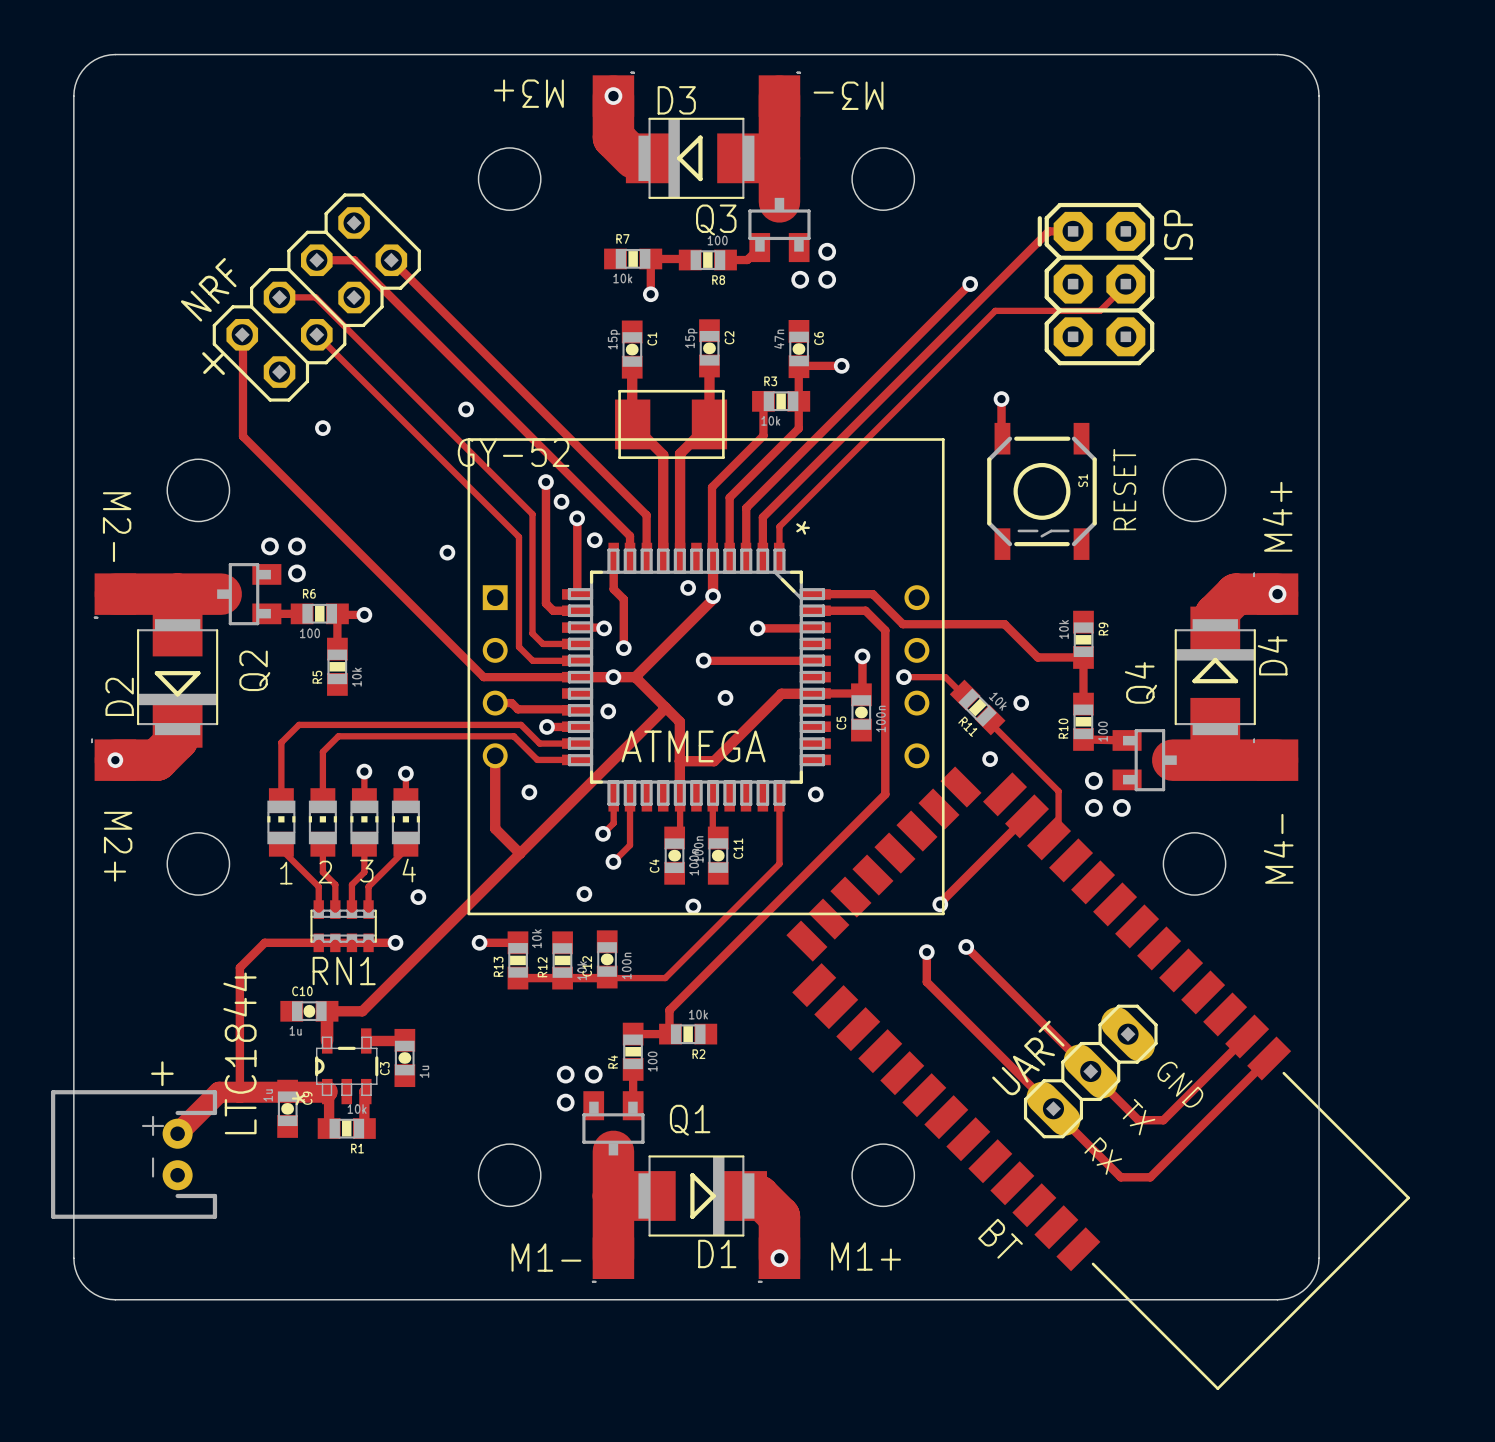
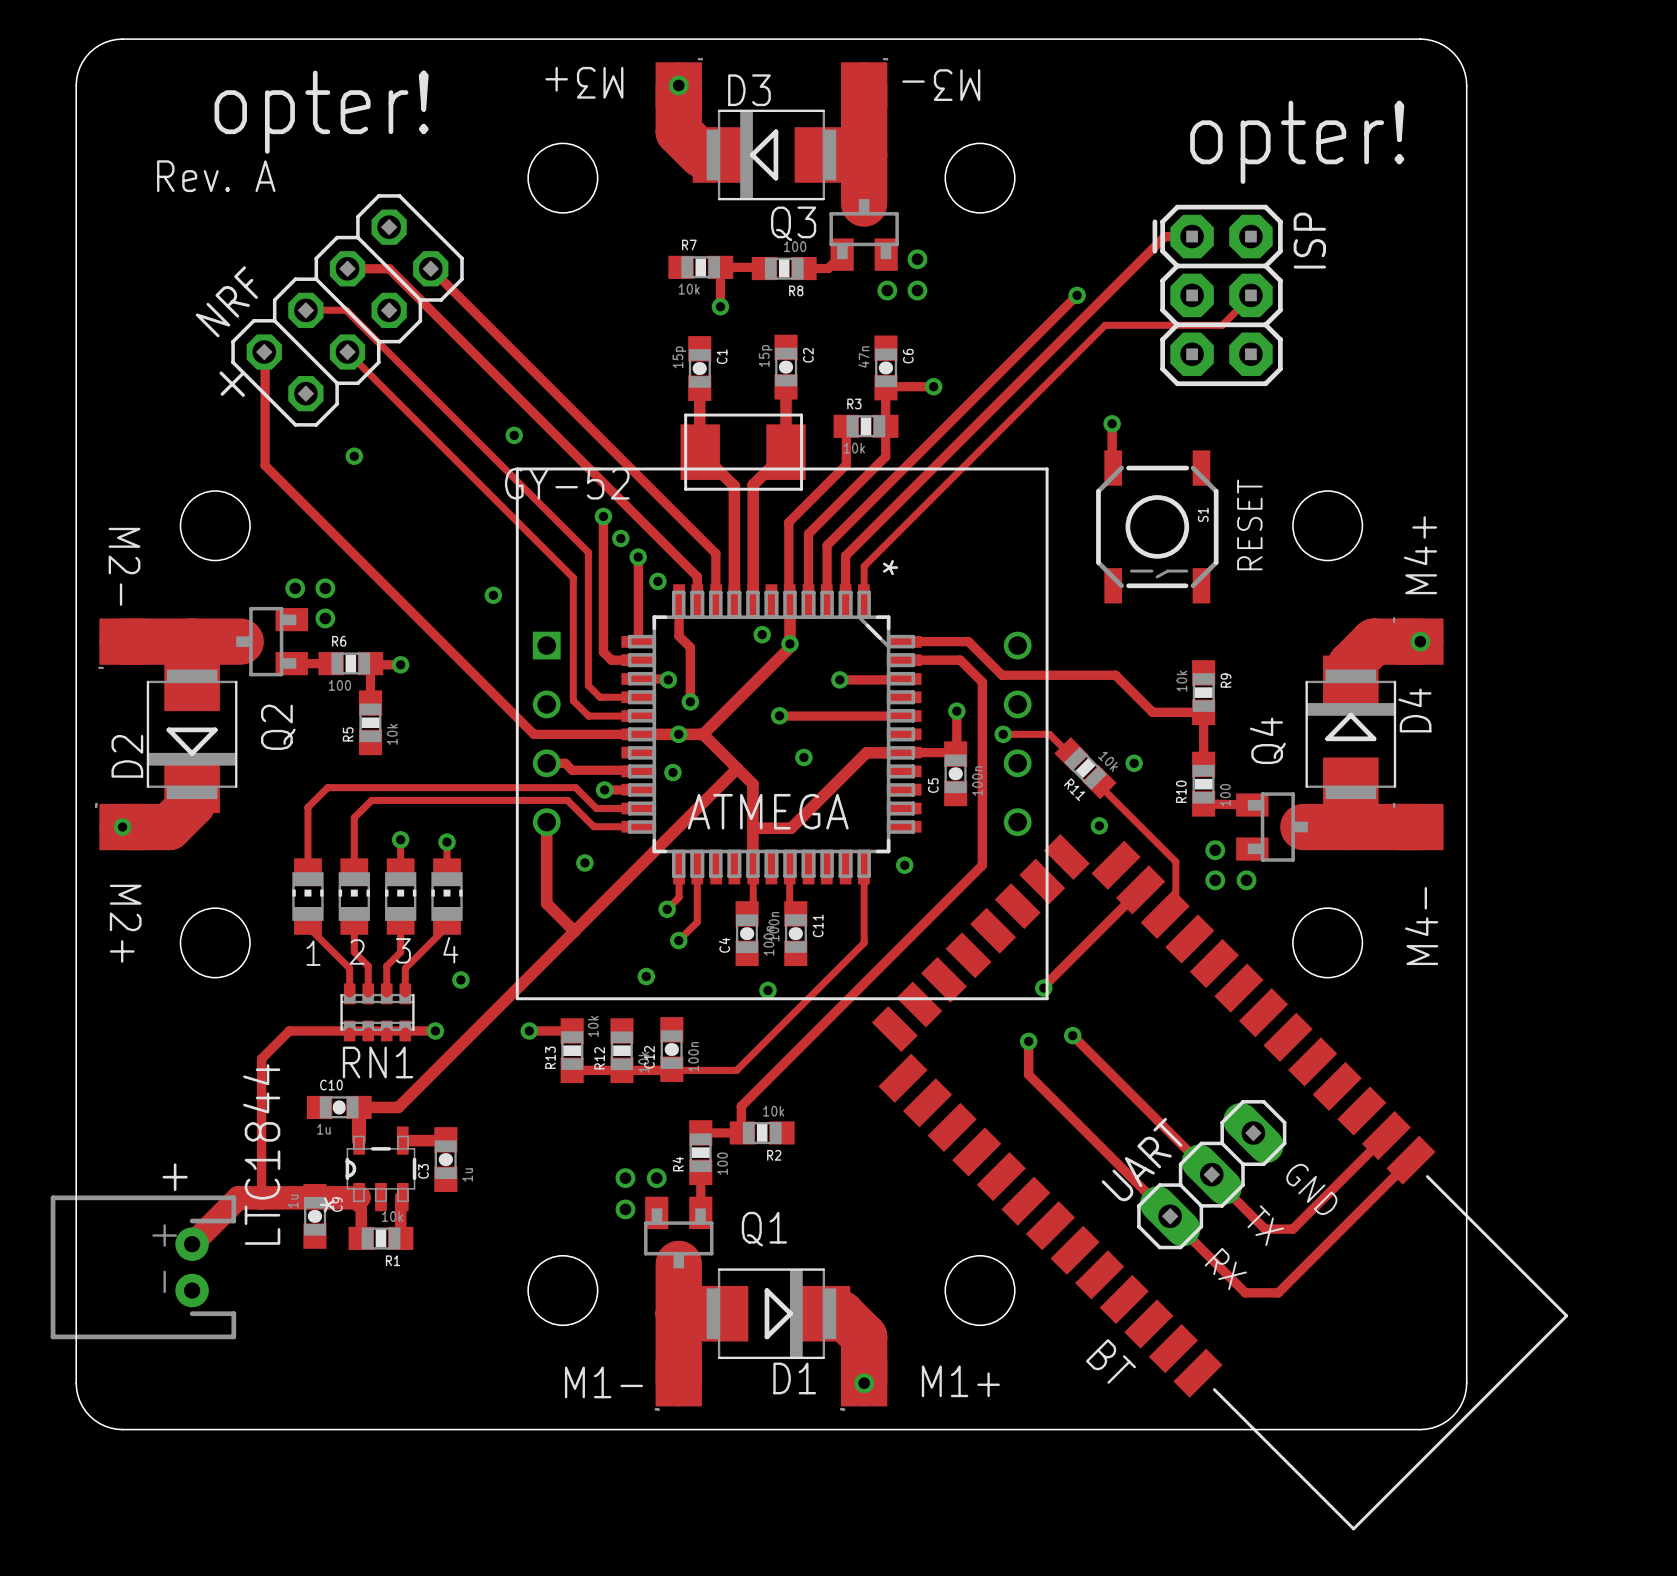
text: none -> opter! (321, 112)
text: none -> opter! (1297, 142)
text: none -> Rev. A (216, 176)

